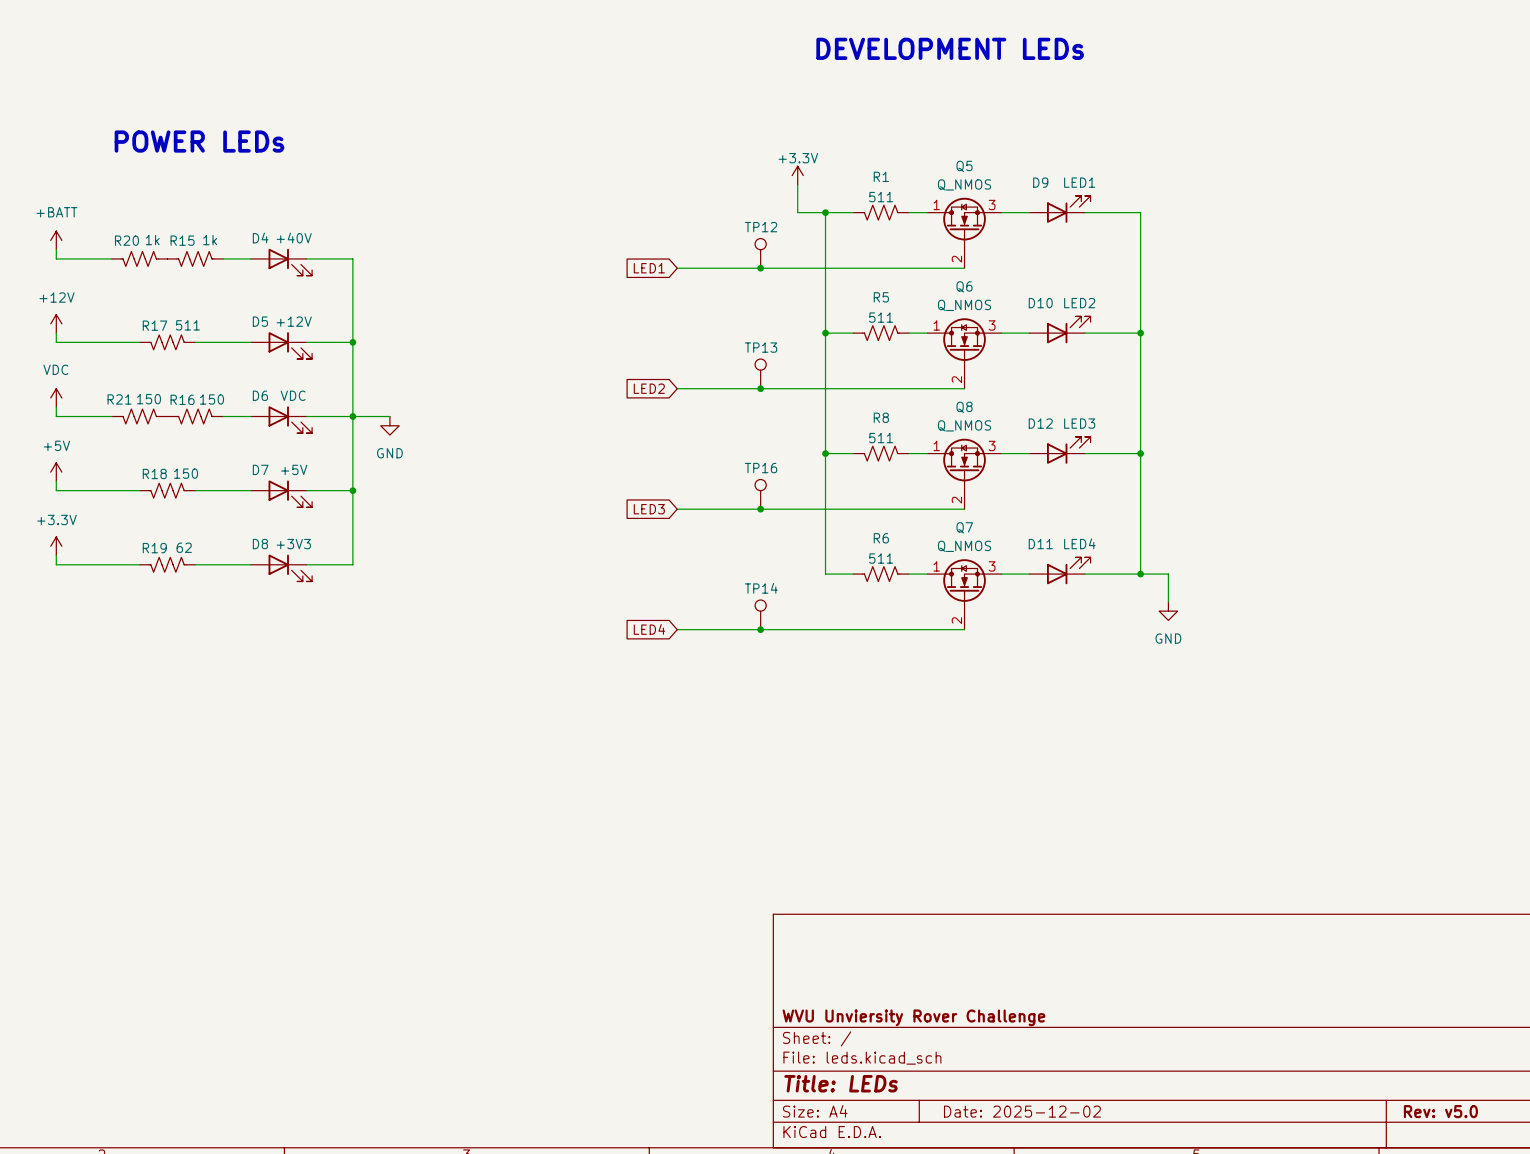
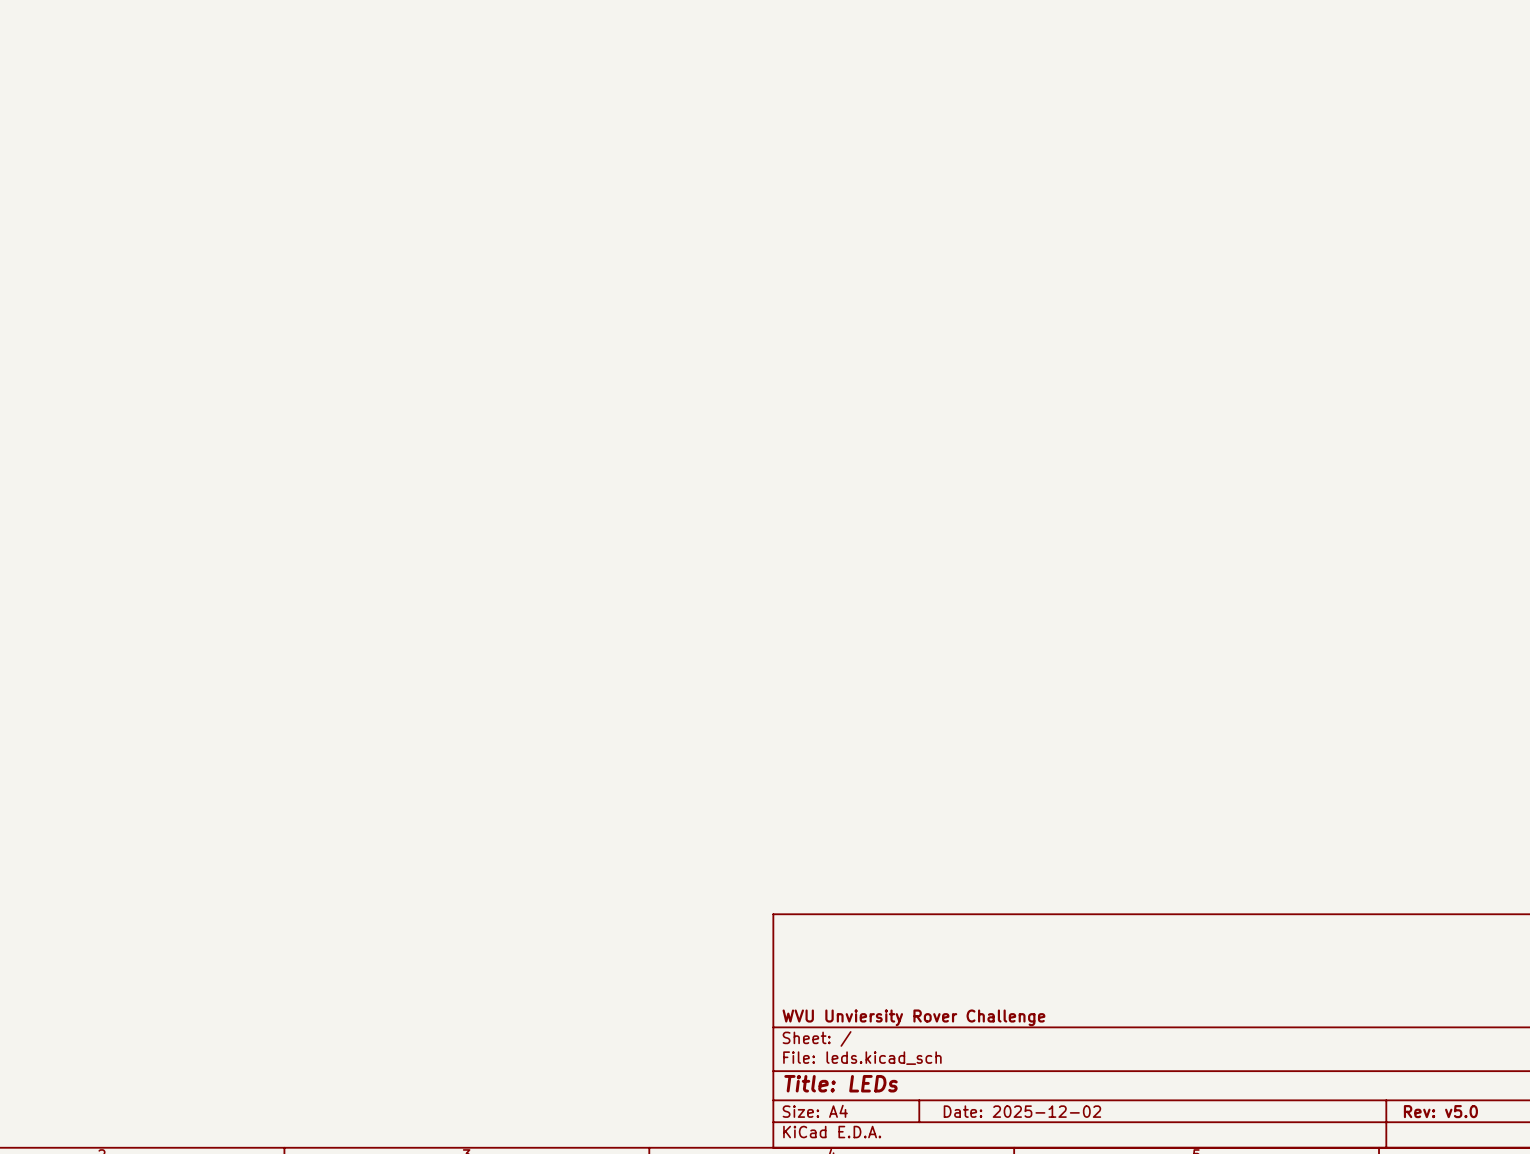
text: DEVELOPMENT LEDs (950, 48) -> none
text: POWER LEDs (199, 141) -> none
power symbol: +3.3V (797, 175) -> none
wire: (797, 184) (797, 212) (853, 212) -> none
D9: LED1 (1059, 209) -> none
wire: (825, 212) (825, 574) (853, 574) -> none
junction: (825, 212) -> none
R1: 511 (881, 212) -> none
wire: (908, 212) (927, 212) -> none
wire: (1001, 212) (1029, 212) -> none
wire: (1085, 212) (1140, 212) (1140, 574) -> none
Q5: Q_NMOS (964, 233) -> none
power symbol: +BATT (56, 240) -> none
wire: (56, 249) (56, 258) (111, 258) -> none
TP12: (760, 253) -> none
R20: 1k (139, 258) -> none
R15: 1k (195, 258) -> none
wire: (223, 258) (250, 258) -> none
wire: (306, 258) (352, 258) (352, 564) (306, 564) -> none
D4: +40V (281, 262) -> none
global label: LED1 (649, 268) -> none
wire: (677, 268) (964, 268) -> none
junction: (760, 268) -> none
power symbol: +12V (56, 323) -> none
D10: LED2 (1059, 329) -> none
wire: (56, 333) (56, 342) (139, 342) -> none
wire: (825, 333) (853, 333) -> none
junction: (825, 333) -> none
R5: 511 (881, 333) -> none
wire: (908, 333) (927, 333) -> none
wire: (1001, 333) (1029, 333) -> none
wire: (1085, 333) (1140, 333) -> none
junction: (1140, 333) -> none
R17: 511 (167, 342) -> none
wire: (195, 342) (250, 342) -> none
wire: (306, 342) (352, 342) -> none
junction: (352, 342) -> none
D5: +12V (281, 345) -> none
Q6: Q_NMOS (964, 353) -> none
TP13: (760, 373) -> none
global label: LED2 (649, 388) -> none
wire: (677, 388) (964, 388) -> none
junction: (760, 388) -> none
power symbol: VDC (56, 397) -> none
wire: (56, 407) (56, 416) (111, 416) -> none
R21: 150 (139, 416) -> none
R16: 150 (195, 416) -> none
wire: (223, 416) (250, 416) -> none
wire: (306, 416) (389, 416) -> none
junction: (352, 416) -> none
D6: VDC (281, 419) -> none
power symbol: GND (389, 425) -> none
D12: LED3 (1059, 450) -> none
wire: (825, 453) (853, 453) -> none
junction: (825, 453) -> none
R8: 511 (881, 453) -> none
wire: (908, 453) (927, 453) -> none
wire: (1001, 453) (1029, 453) -> none
wire: (1085, 453) (1140, 453) -> none
junction: (1140, 453) -> none
power symbol: +5V (56, 472) -> none
Q8: Q_NMOS (964, 473) -> none
wire: (56, 481) (56, 490) (139, 490) -> none
R18: 150 (167, 490) -> none
wire: (195, 490) (250, 490) -> none
wire: (306, 490) (352, 490) -> none
junction: (352, 490) -> none
D7: +5V (281, 493) -> none
TP16: (760, 494) -> none
global label: LED3 (649, 509) -> none
wire: (677, 509) (964, 509) -> none
junction: (760, 509) -> none
power symbol: +3.3V (56, 546) -> none
wire: (56, 555) (56, 564) (139, 564) -> none
R19: 62 (167, 564) -> none
wire: (195, 564) (250, 564) -> none
D8: +3V3 (281, 568) -> none
D11: LED4 (1059, 570) -> none
R6: 511 (881, 574) -> none
wire: (908, 574) (927, 574) -> none
wire: (1001, 574) (1029, 574) -> none
wire: (1085, 574) (1168, 574) (1168, 601) -> none
junction: (1140, 574) -> none
Q7: Q_NMOS (964, 594) -> none
power symbol: GND (1168, 611) -> none
TP14: (760, 614) -> none
global label: LED4 (649, 629) -> none
wire: (677, 629) (964, 629) -> none
junction: (760, 629) -> none

